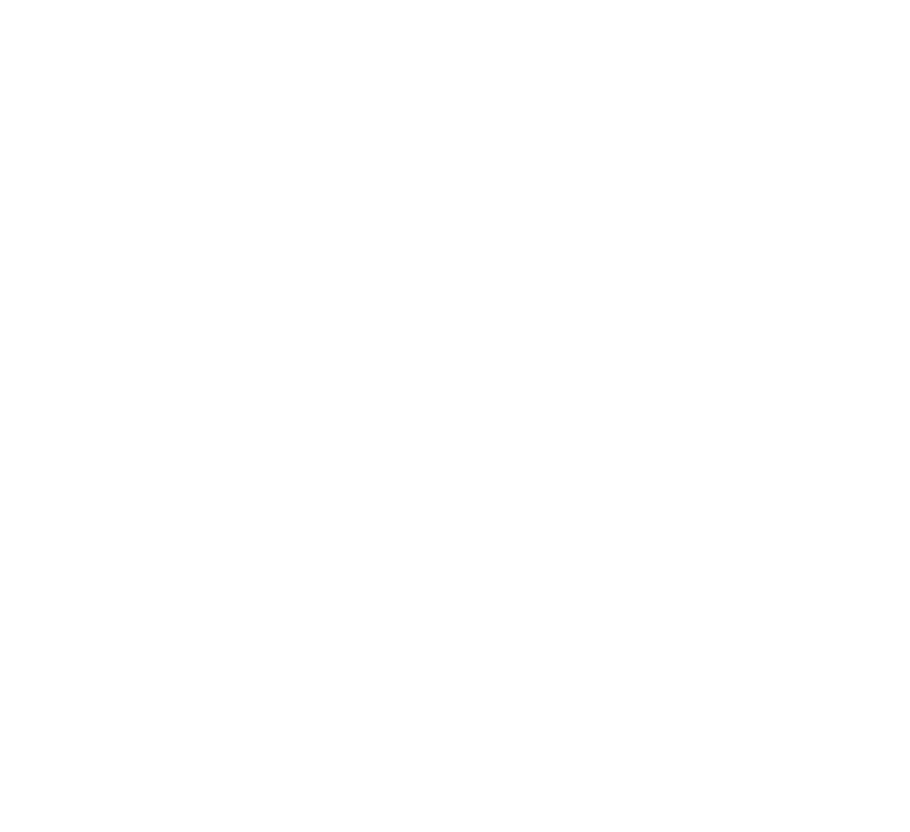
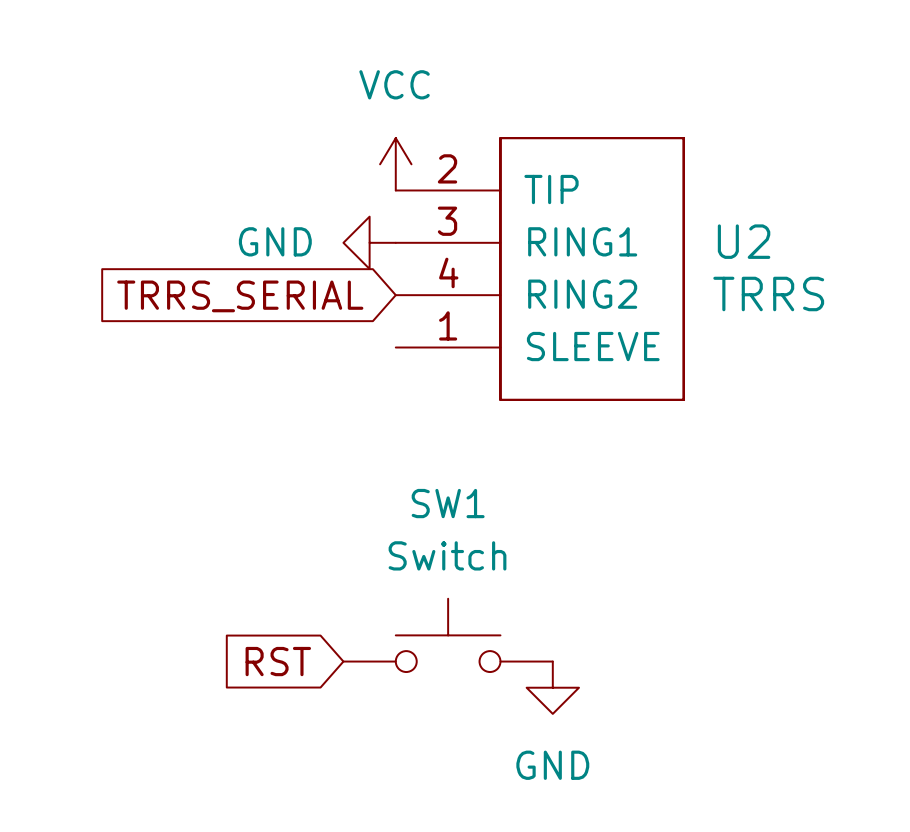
power symbol: none -> VCC (395, 164)
power symbol: none -> GND (369, 242)
U2: none -> TRRS (539, 268)
global label: none -> TRRS_SERIAL (240, 296)
SW1: none -> Switch (448, 635)
global label: none -> RST (278, 661)
power symbol: none -> GND (552, 687)

